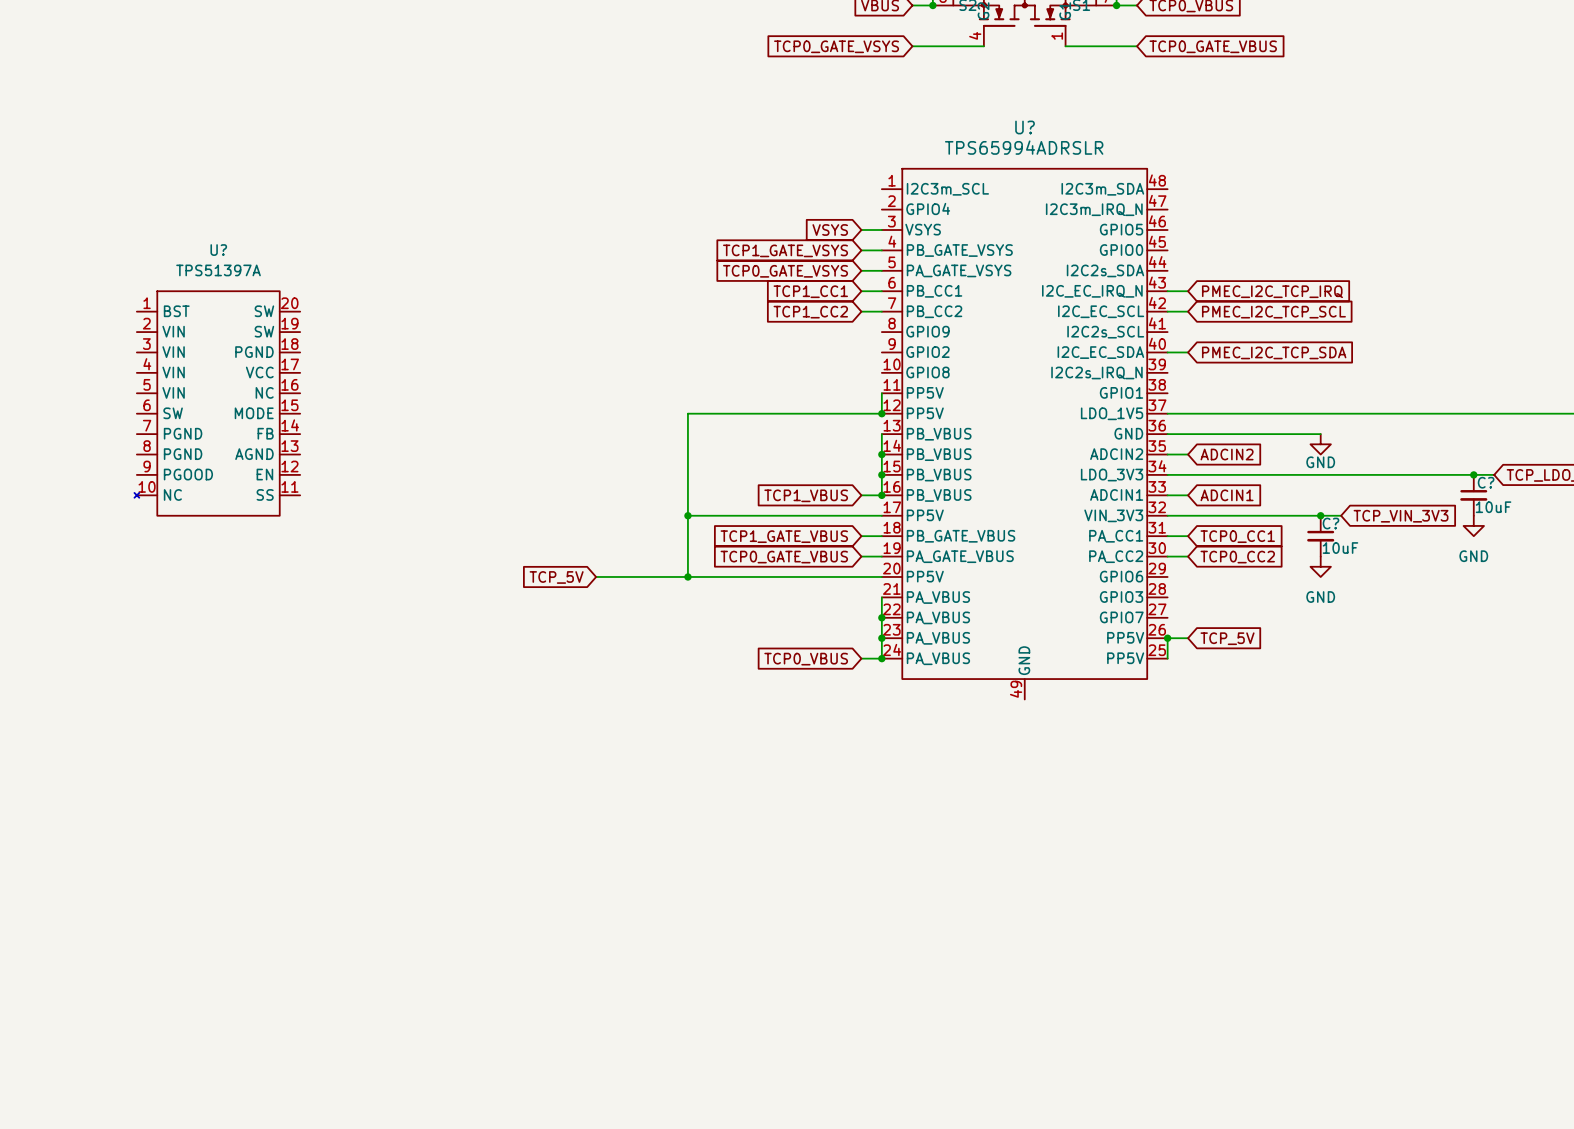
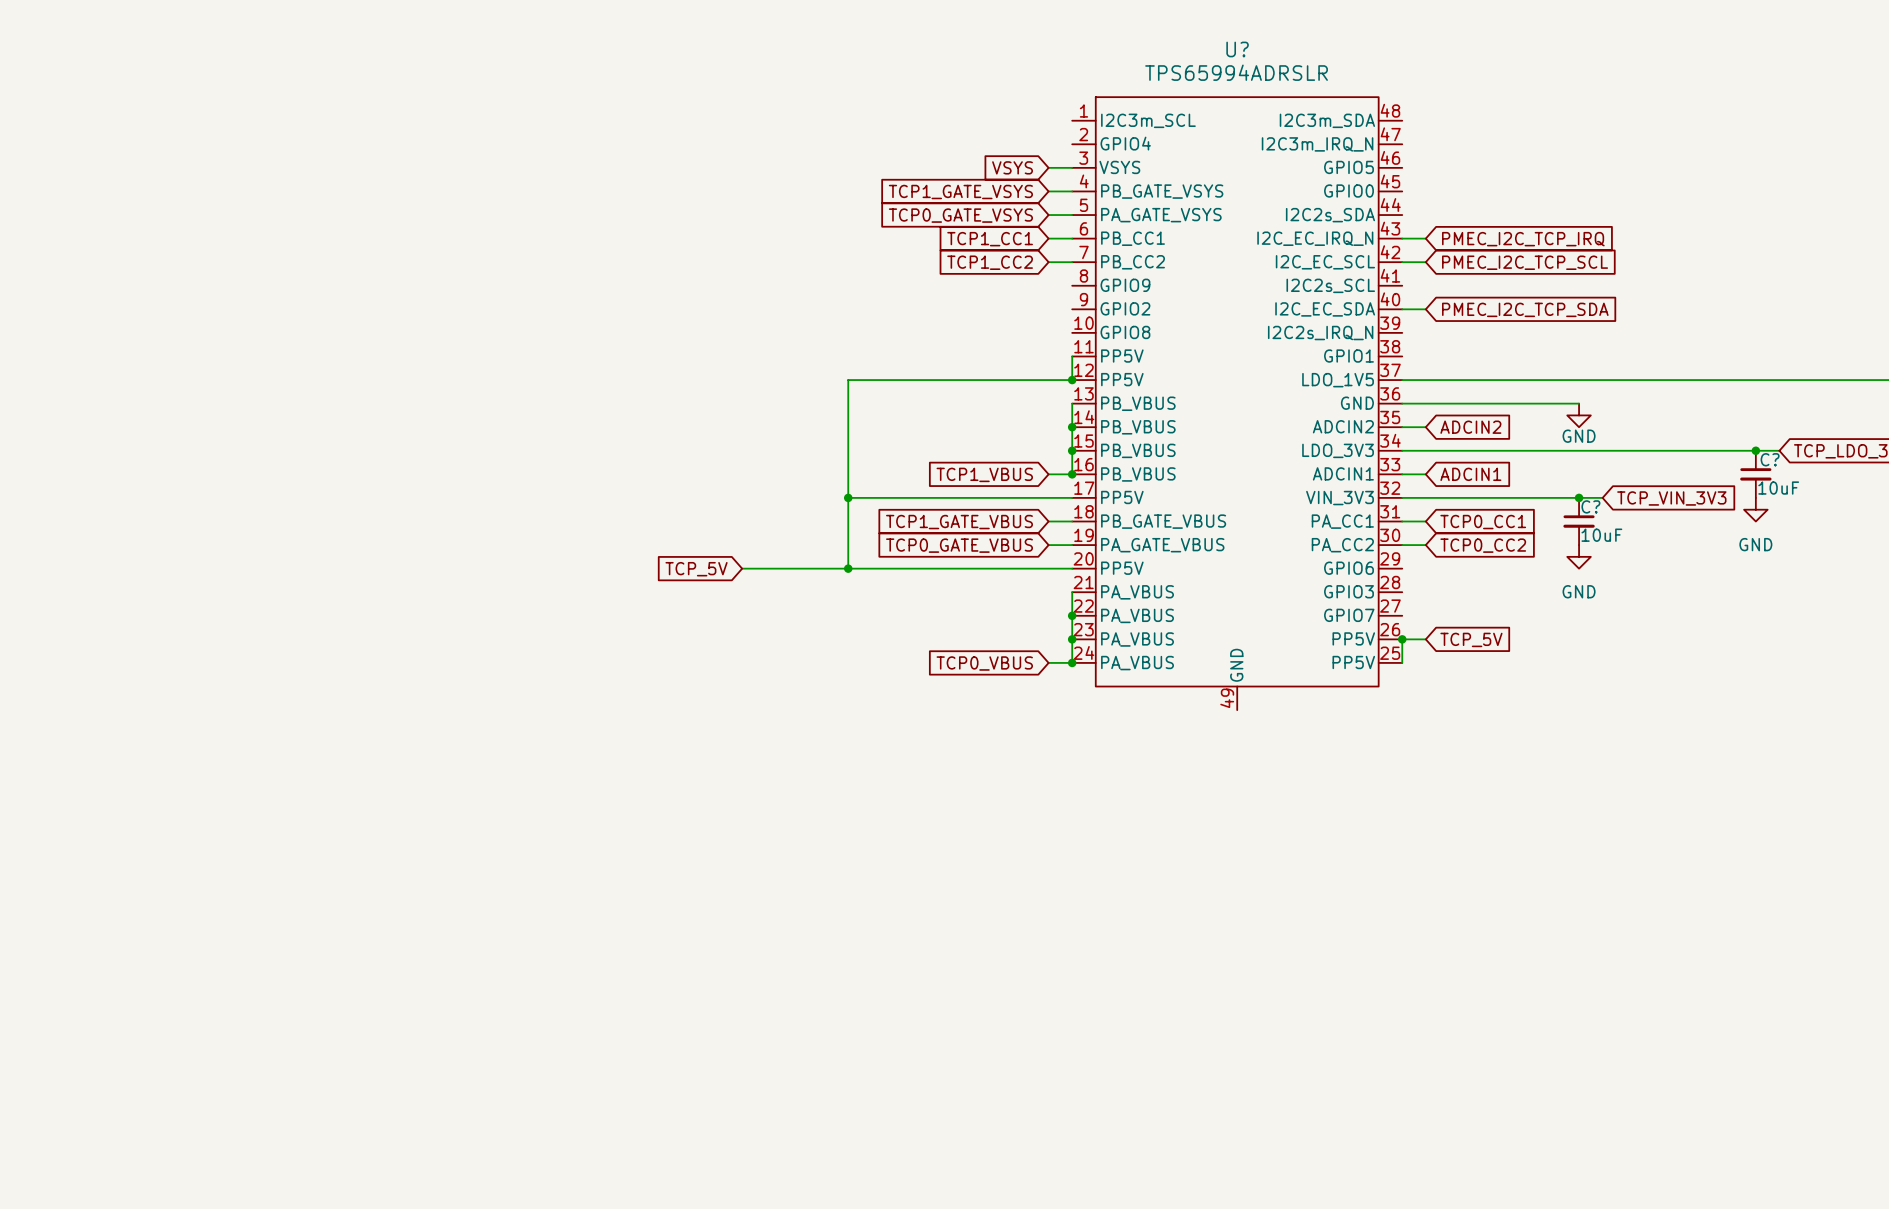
U?: TPS51397A (217, 403) -> none

